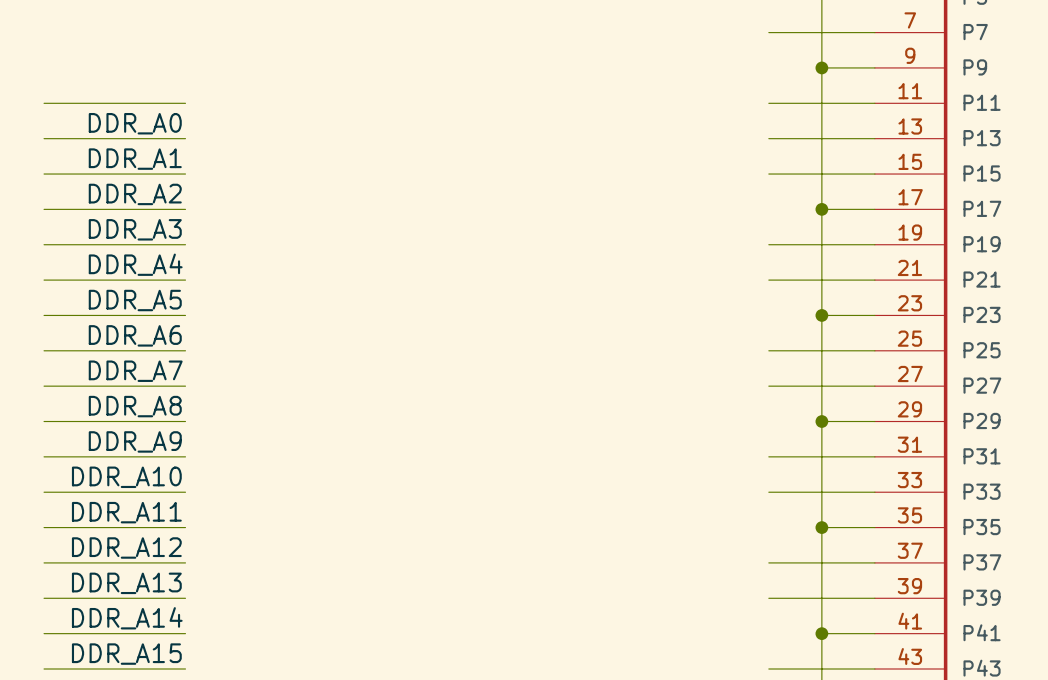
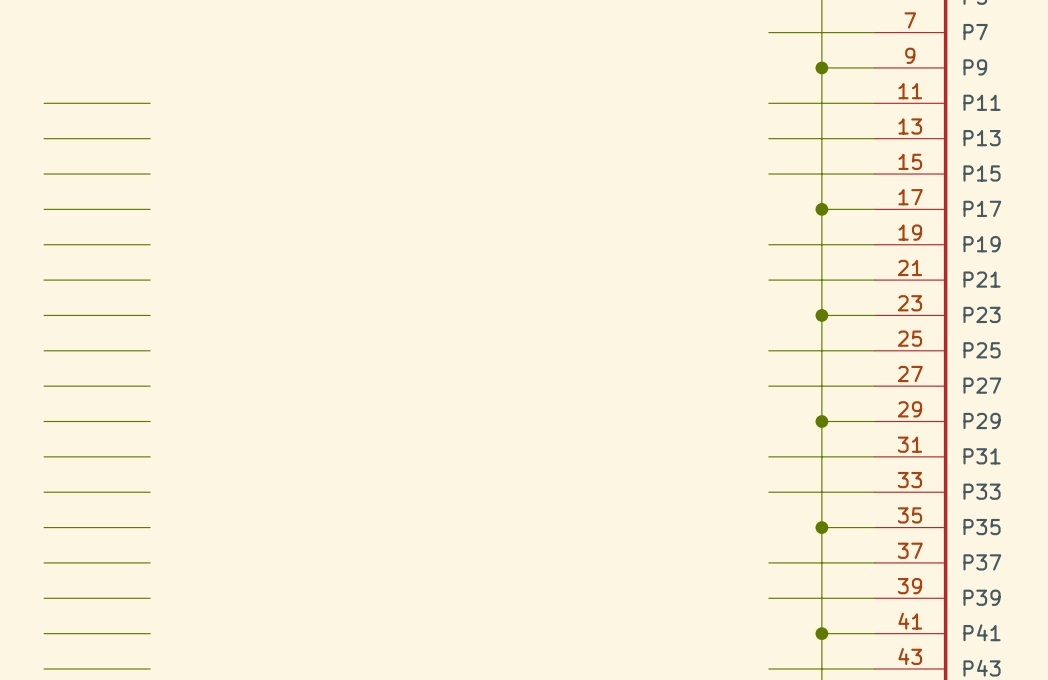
wire: (150, 103) (185, 103) -> none
label: DDR_A0 (135, 123) -> none
wire: (150, 138) (185, 138) -> none
label: DDR_A1 (135, 159) -> none
wire: (150, 174) (185, 174) -> none
label: DDR_A2 (135, 194) -> none
wire: (150, 209) (185, 209) -> none
label: DDR_A3 (135, 229) -> none
wire: (150, 244) (185, 244) -> none
label: DDR_A4 (135, 264) -> none
wire: (150, 280) (185, 280) -> none
label: DDR_A5 (135, 300) -> none
wire: (150, 315) (185, 315) -> none
label: DDR_A6 (135, 335) -> none
wire: (150, 350) (185, 350) -> none
label: DDR_A7 (135, 371) -> none
wire: (150, 386) (185, 386) -> none
label: DDR_A8 (135, 406) -> none
wire: (150, 421) (185, 421) -> none
label: DDR_A9 (135, 441) -> none
wire: (150, 456) (185, 456) -> none
label: DDR_A10 (126, 477) -> none
wire: (150, 492) (185, 492) -> none
label: DDR_A11 (126, 512) -> none
wire: (150, 527) (185, 527) -> none
label: DDR_A12 (126, 548) -> none
wire: (150, 562) (185, 562) -> none
label: DDR_A13 (126, 583) -> none
wire: (150, 598) (185, 598) -> none
label: DDR_A14 (127, 618) -> none
wire: (150, 633) (185, 633) -> none
label: DDR_A15 (126, 654) -> none
wire: (150, 669) (185, 669) -> none

